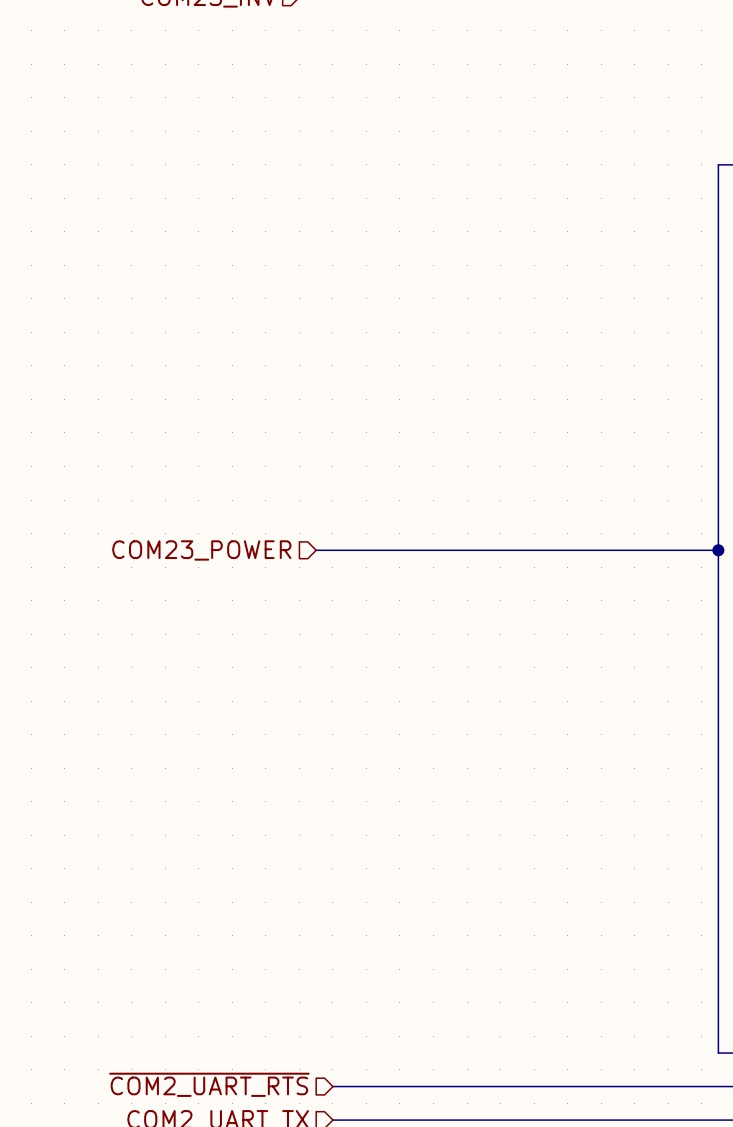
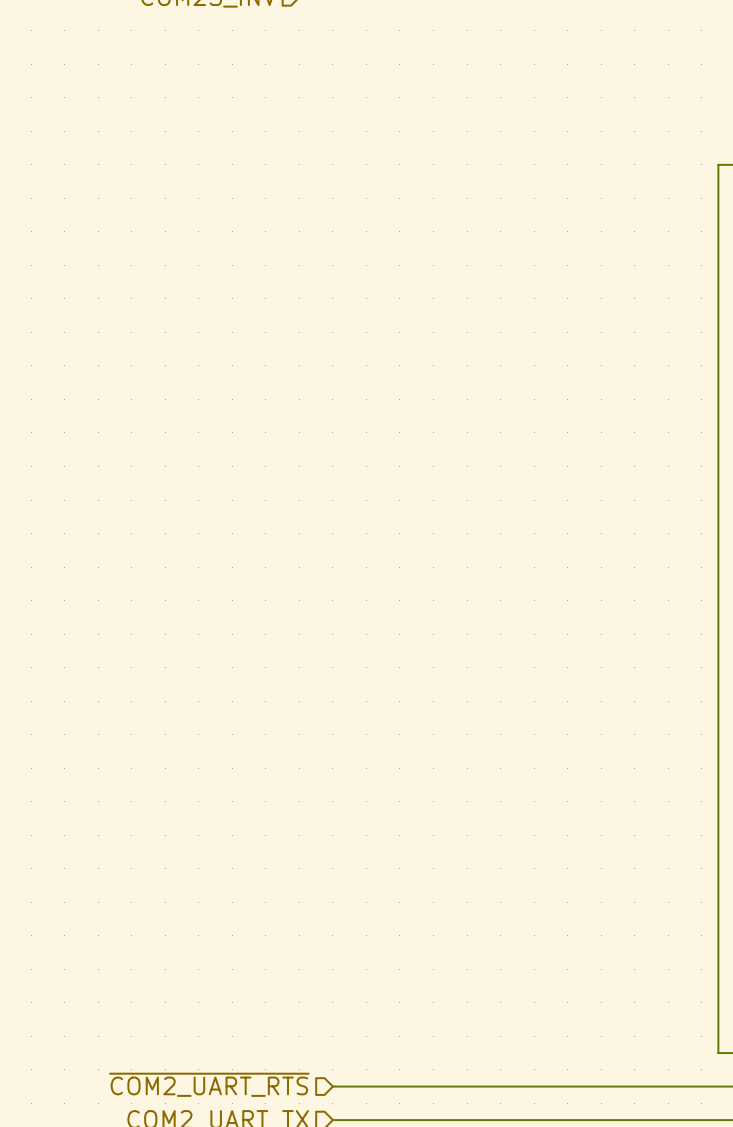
hierarchical label: COM23_POWER (201, 550) -> none
wire: (316, 550) (718, 550) -> none
junction: (718, 550) -> none

